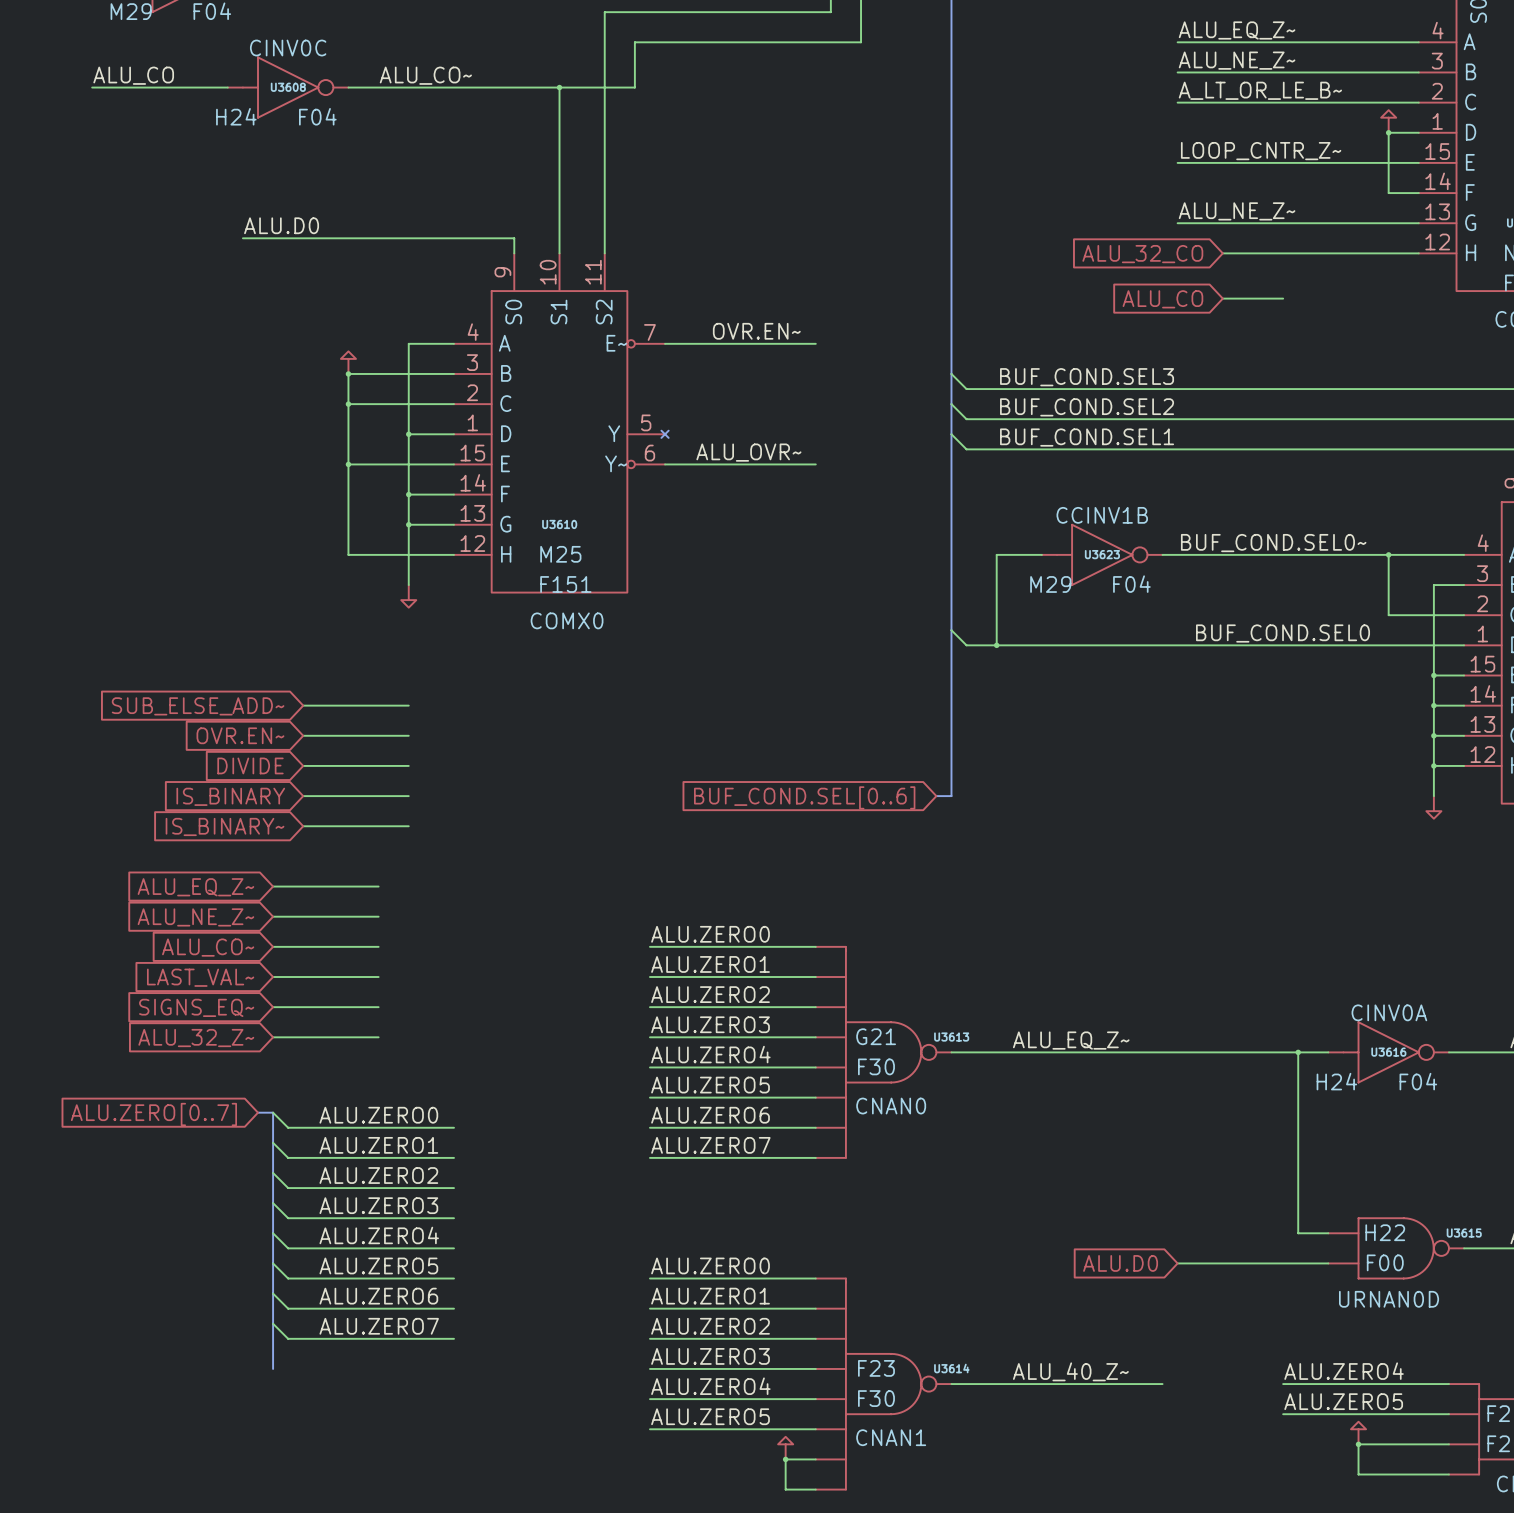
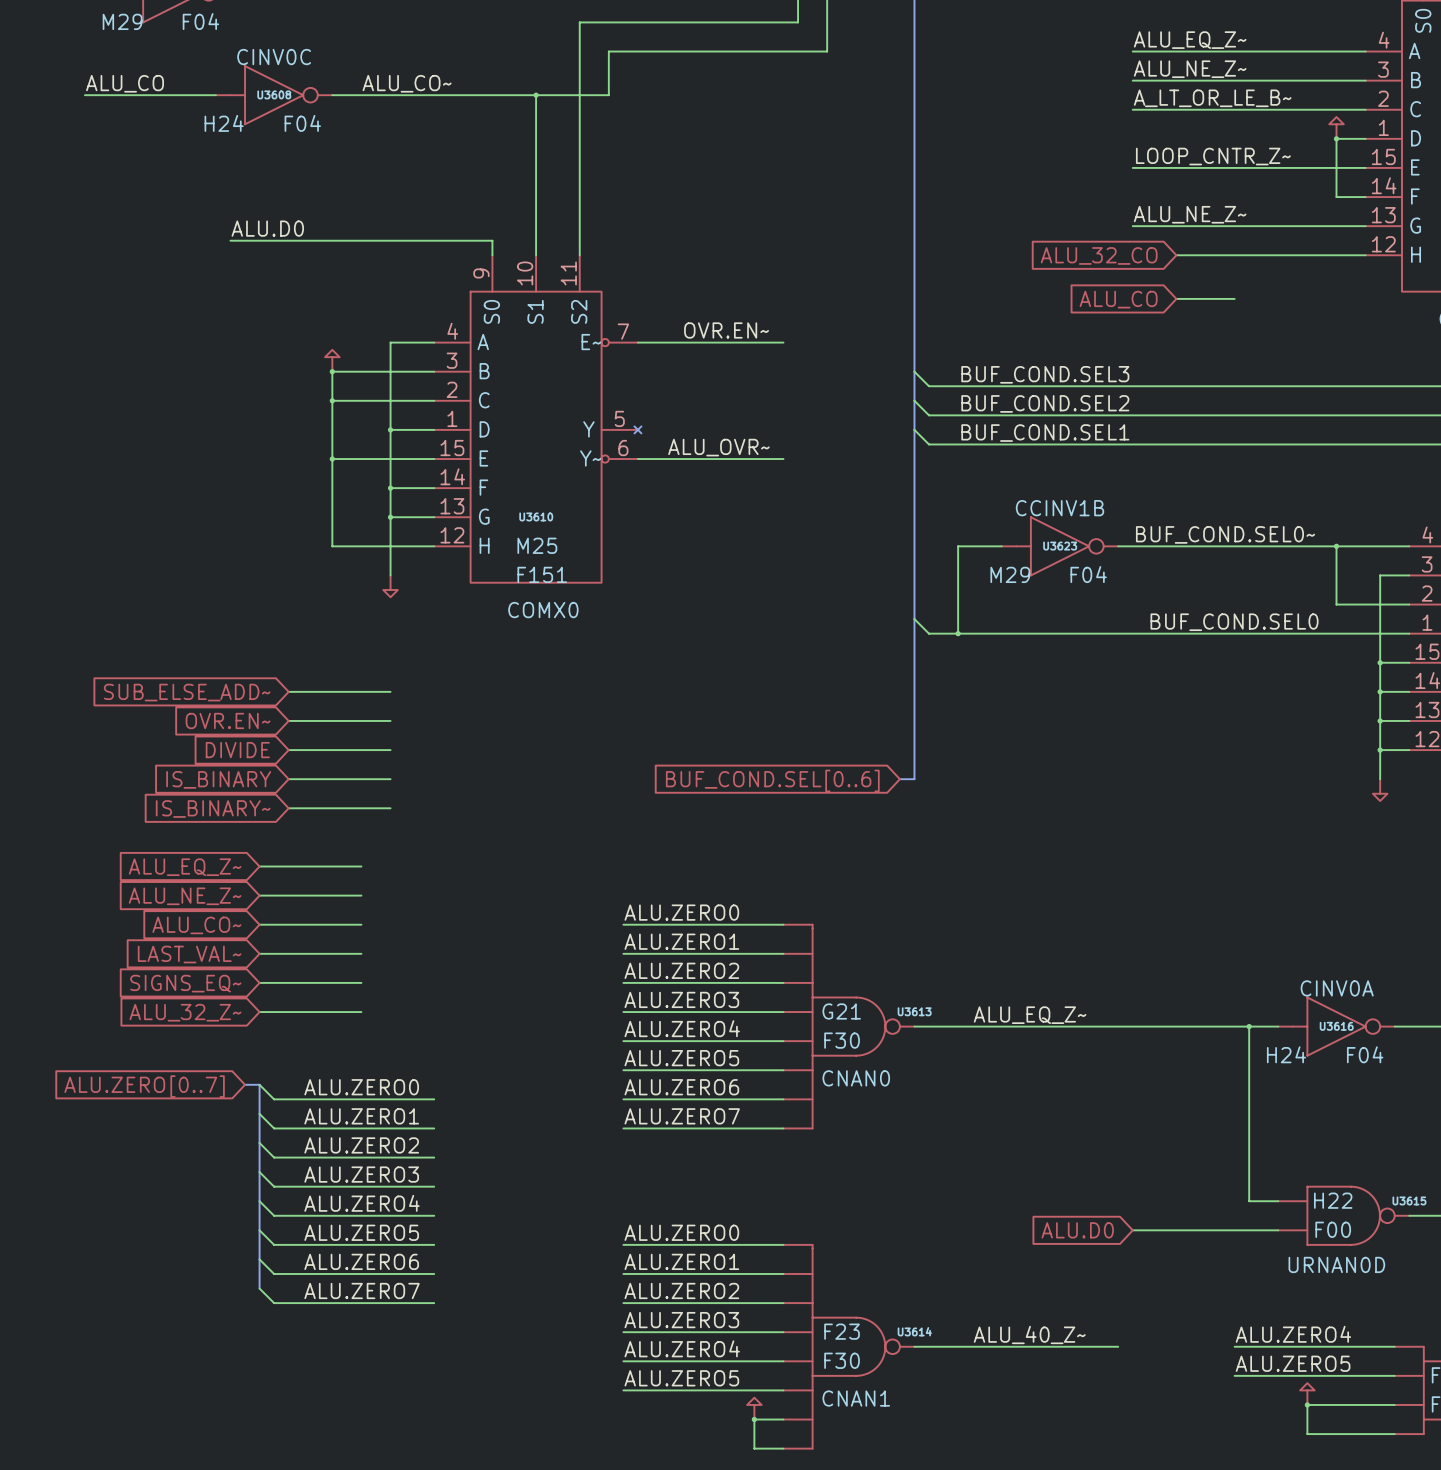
bus: (273, 1323) (273, 1368) -> none

